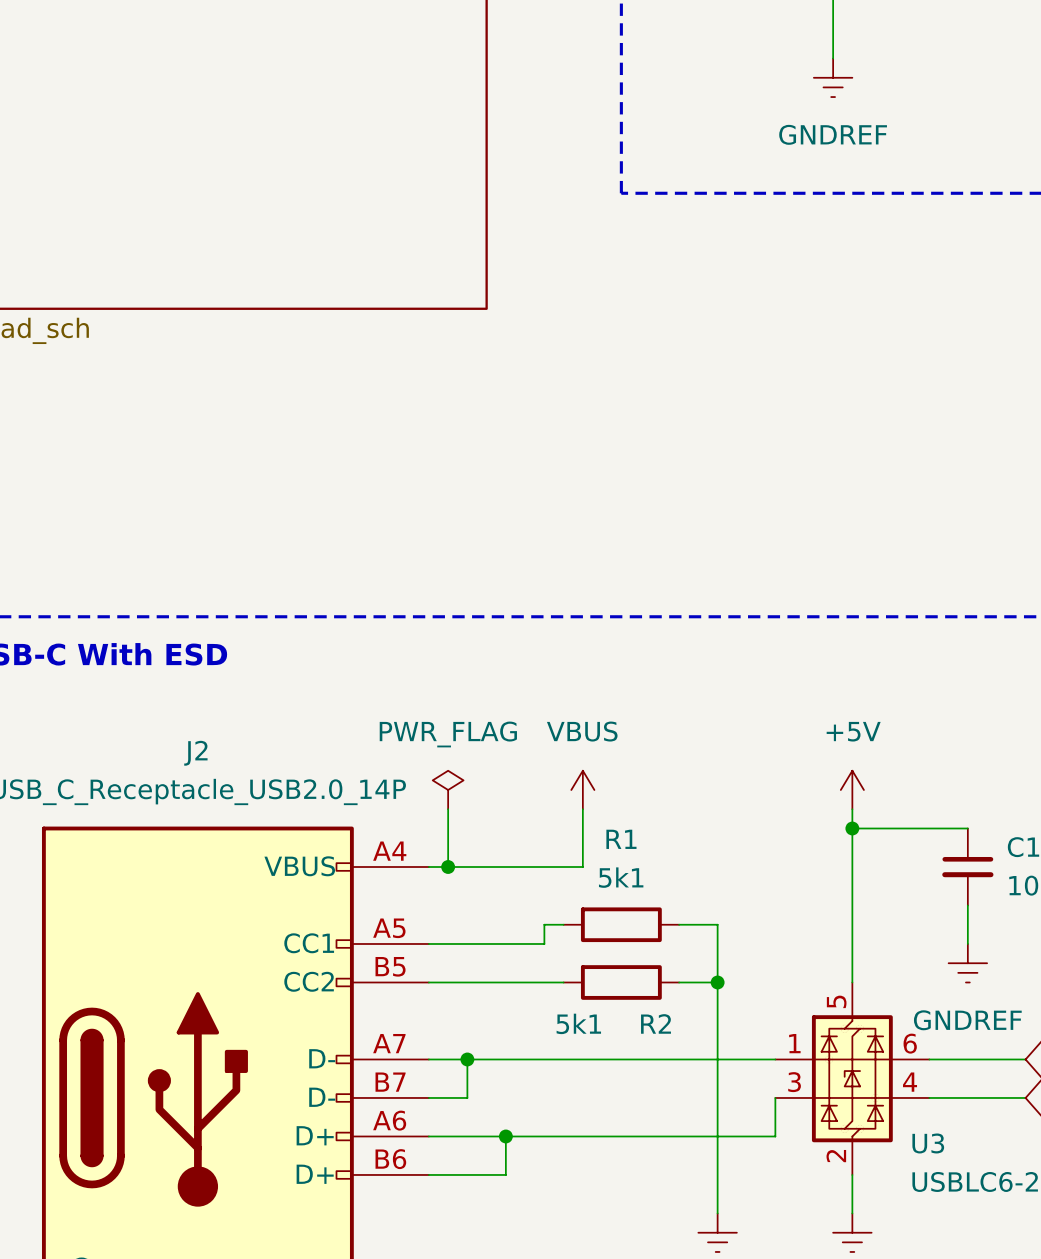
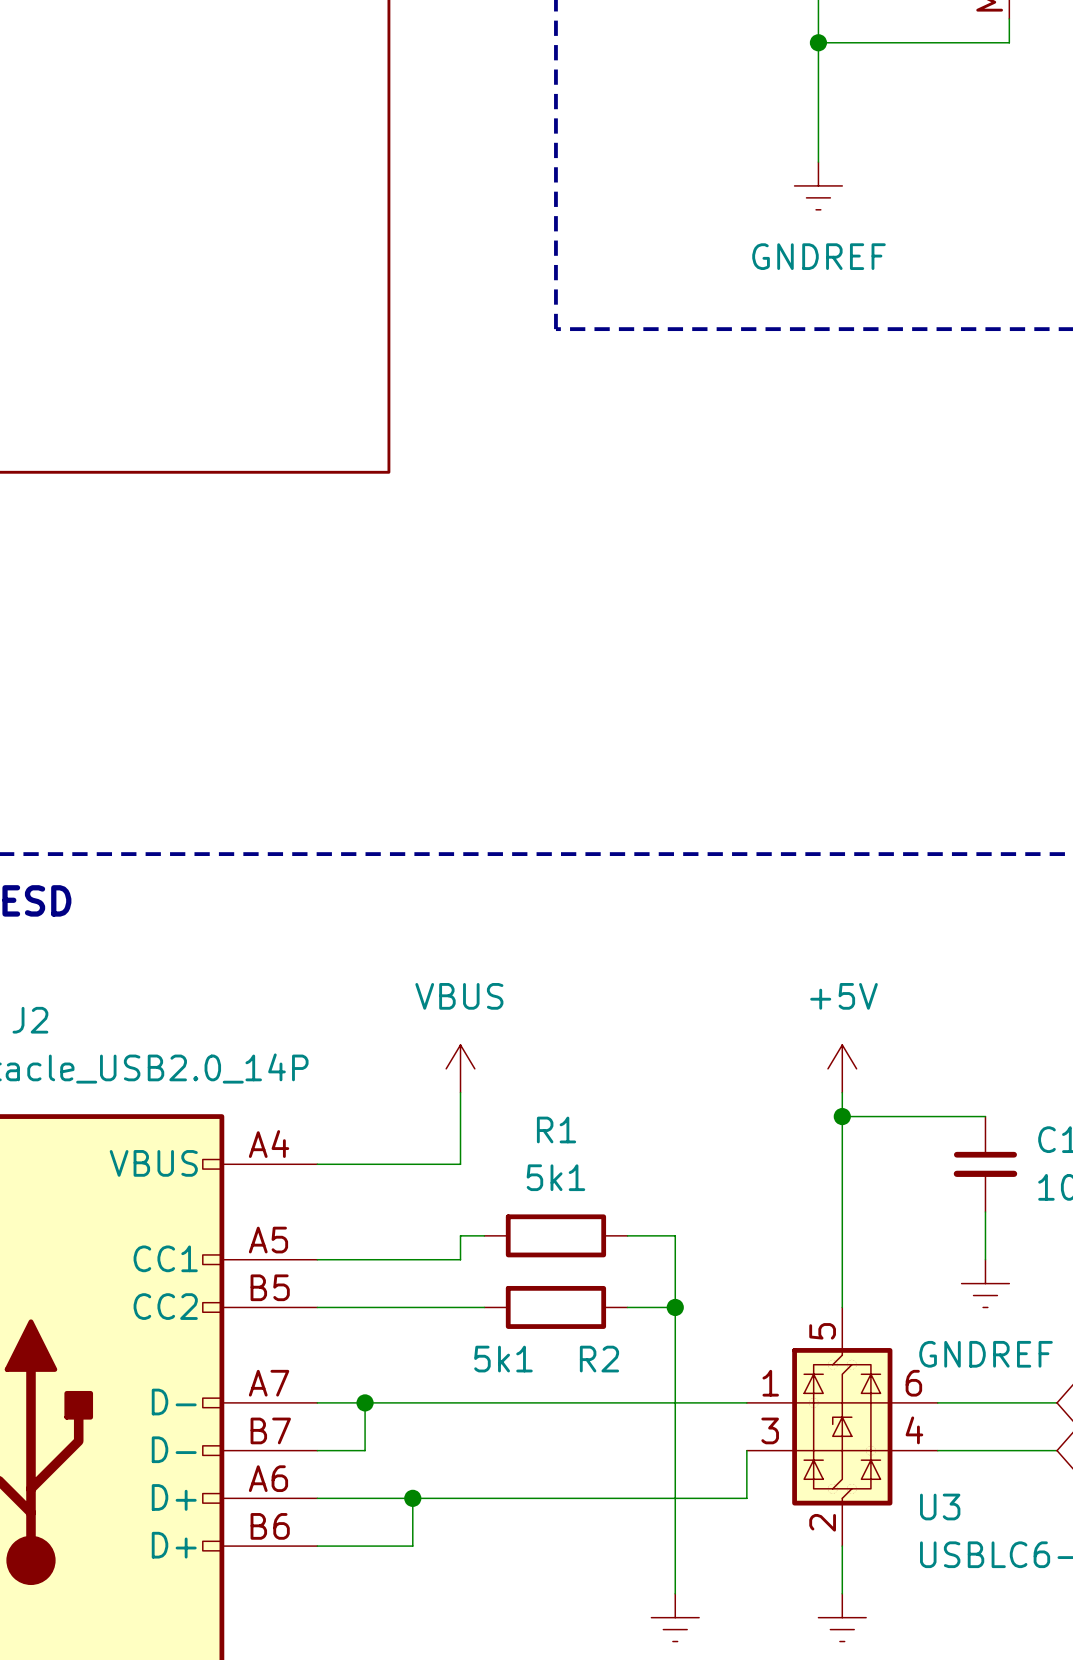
power symbol: PWR_FLAG (448, 790) -> none
power symbol position: VBUS (582, 790) -> VBUS (460, 1068)
wire: (448, 809) (448, 867) -> none
wire: (582, 809) (582, 867) (544, 867) -> (460, 1092) (460, 1164)
junction: (448, 867) -> none

